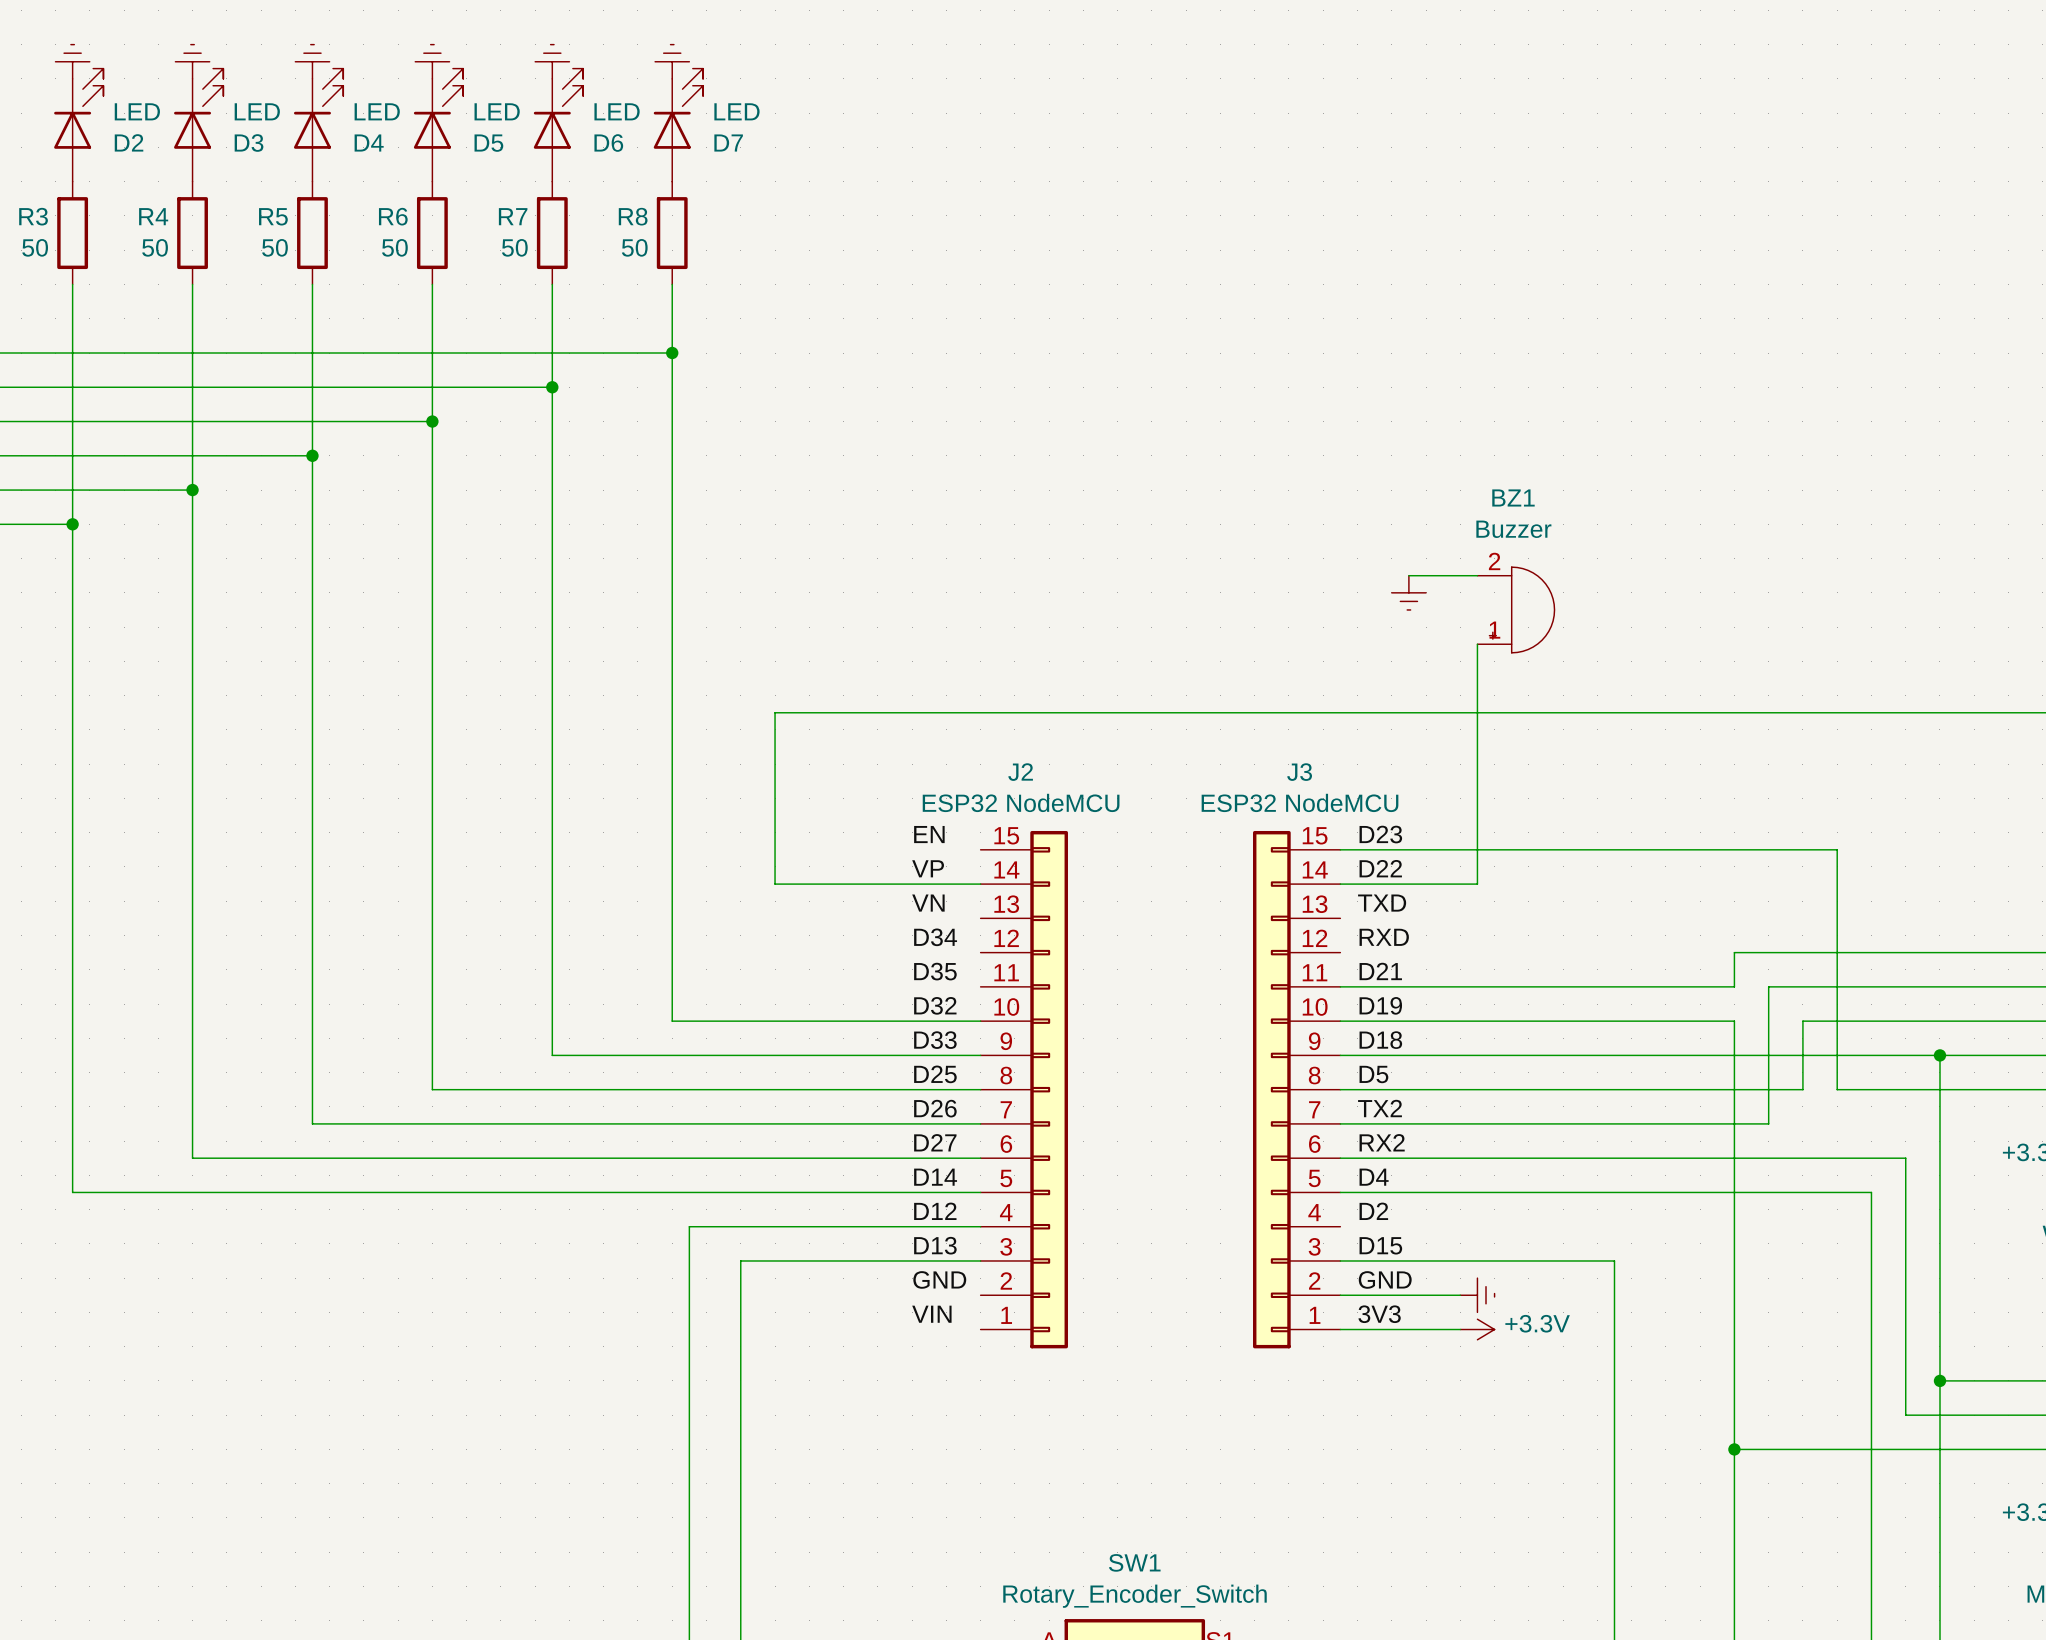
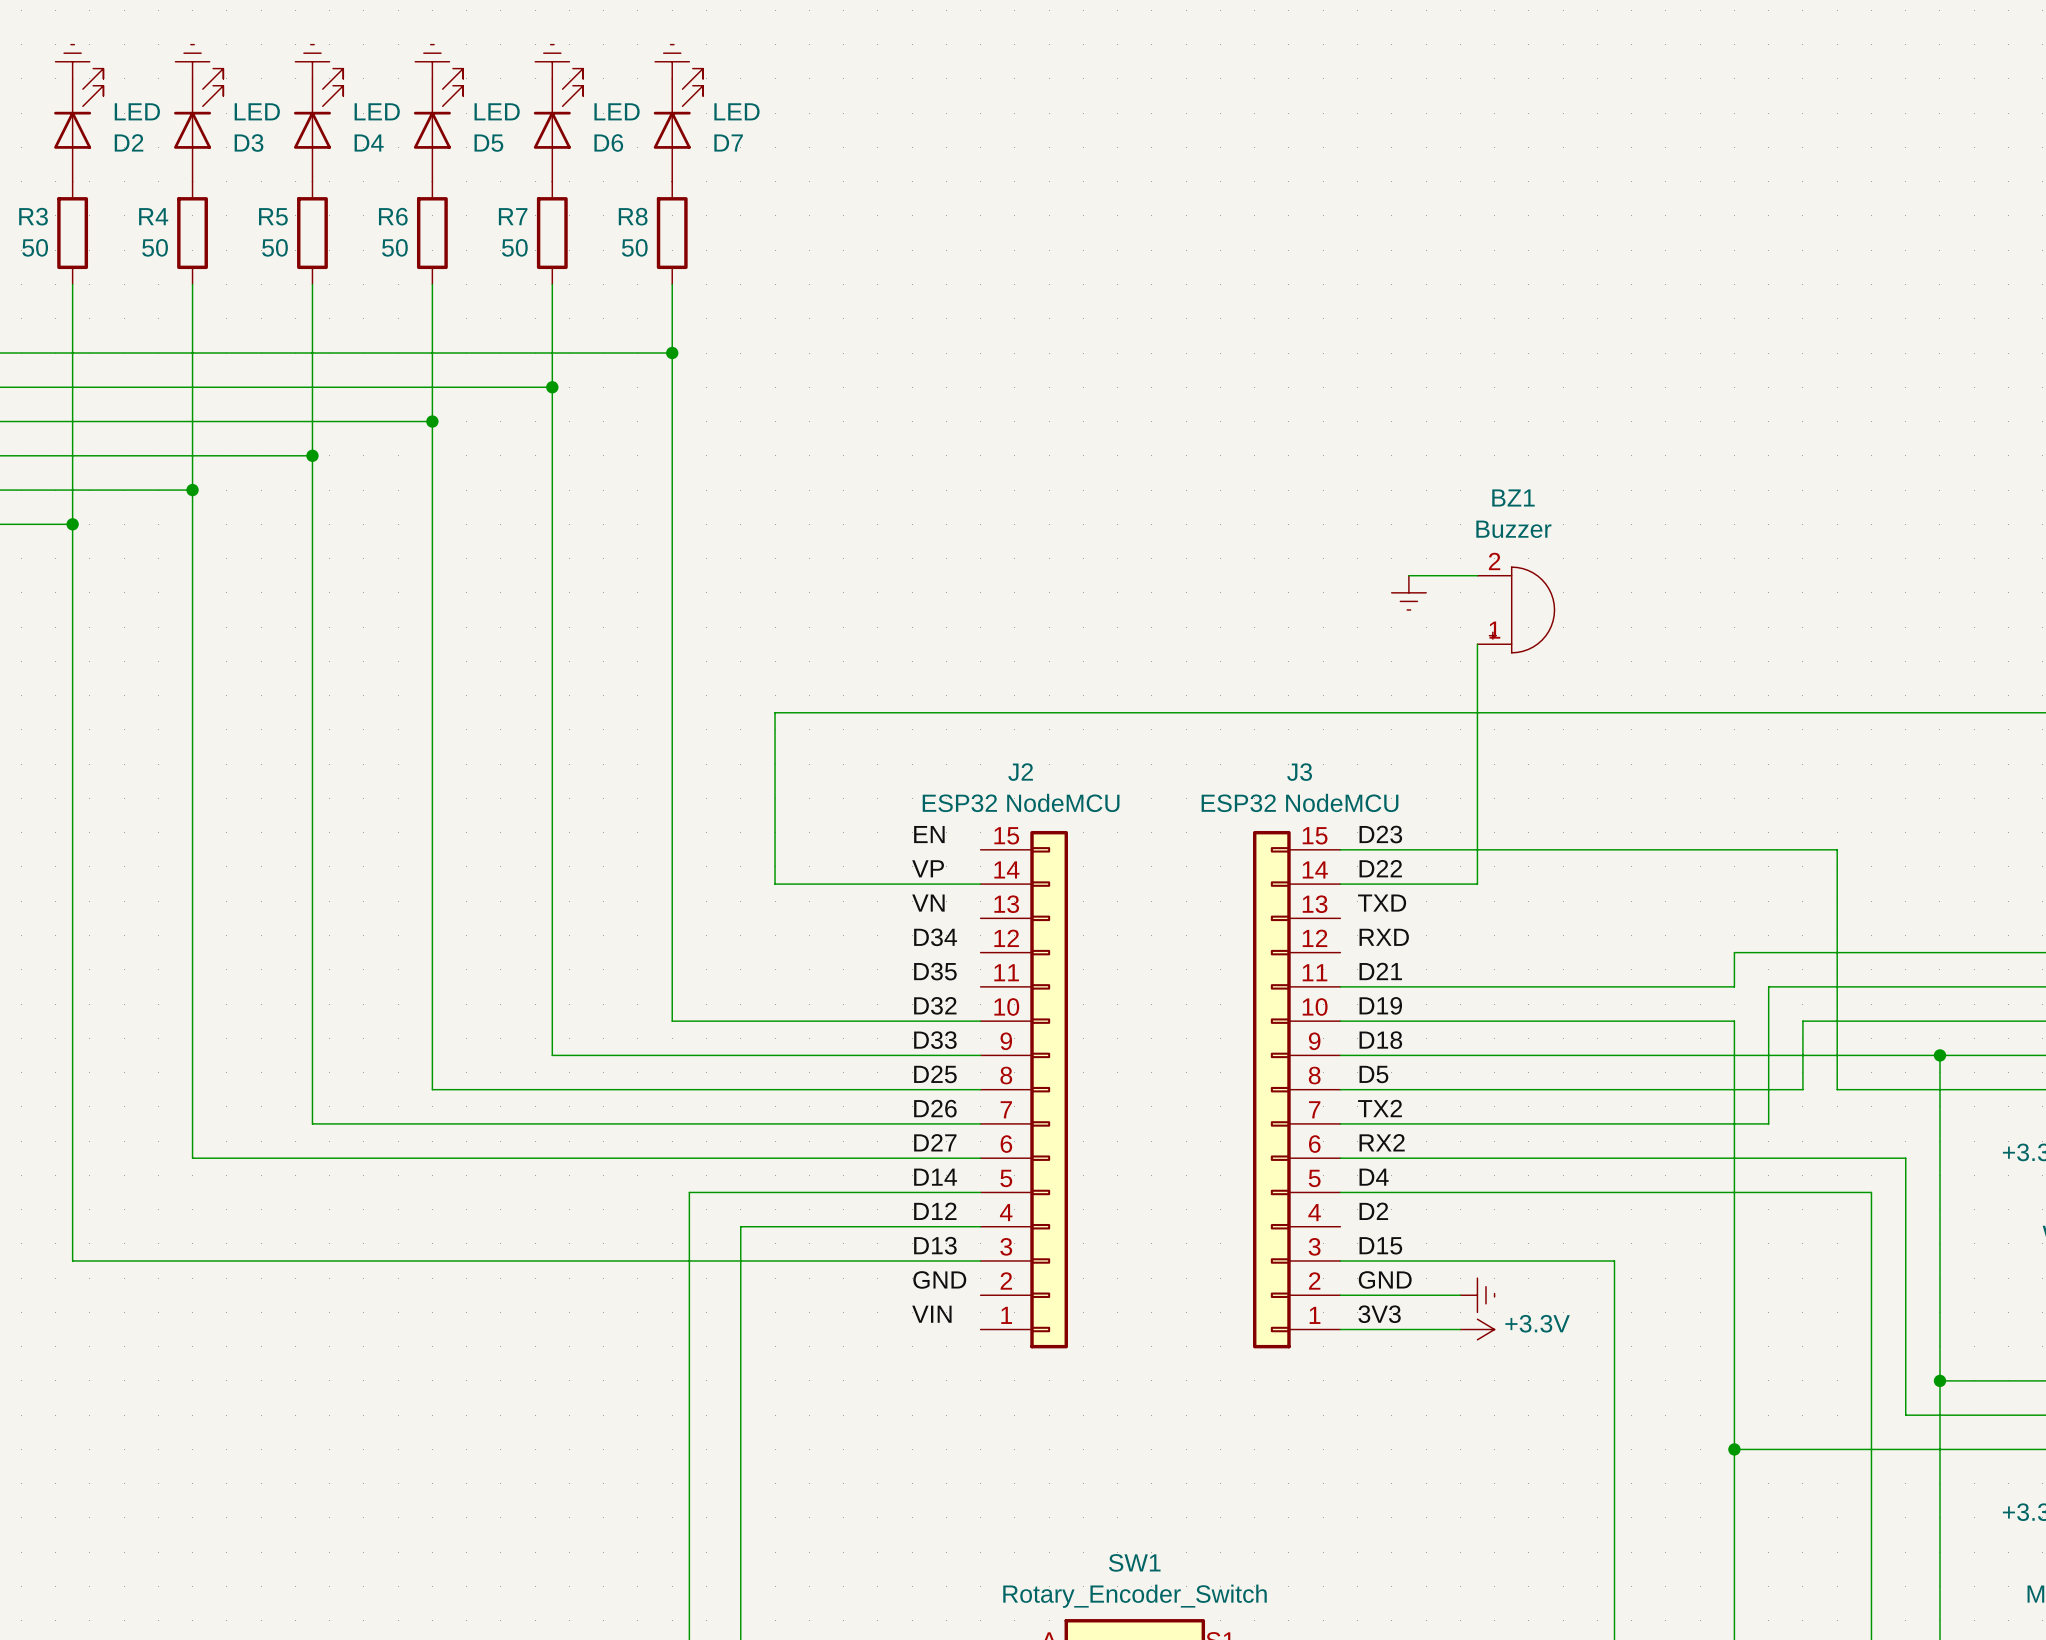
wire: (72, 1192) (689, 1192) -> (72, 1192) (72, 1260) (740, 1260) (740, 1226)
wire: (689, 1226) (740, 1226) -> (689, 1226) (689, 1192)

